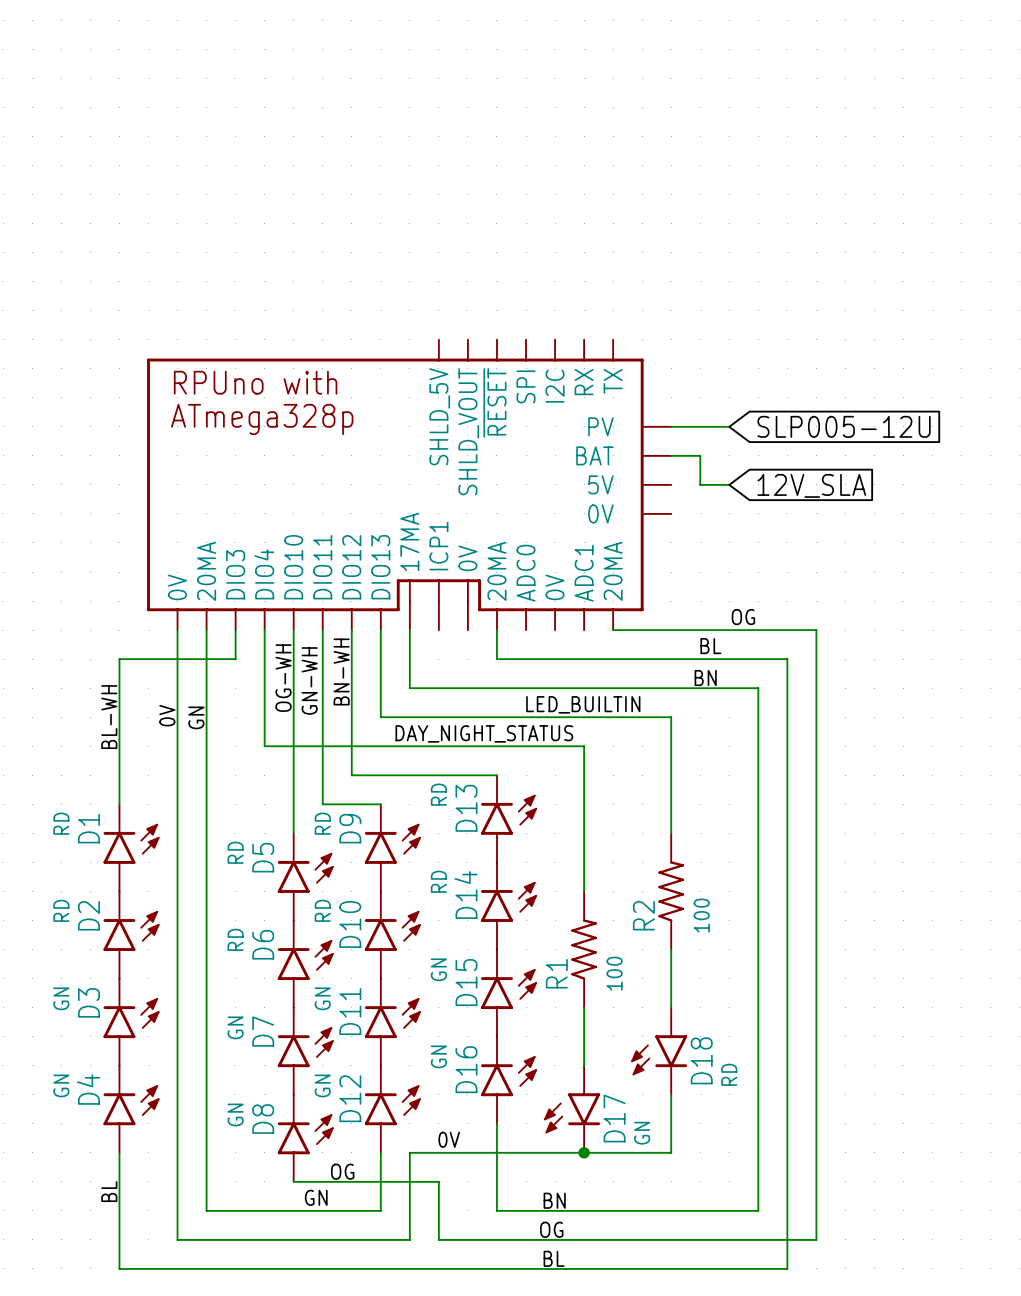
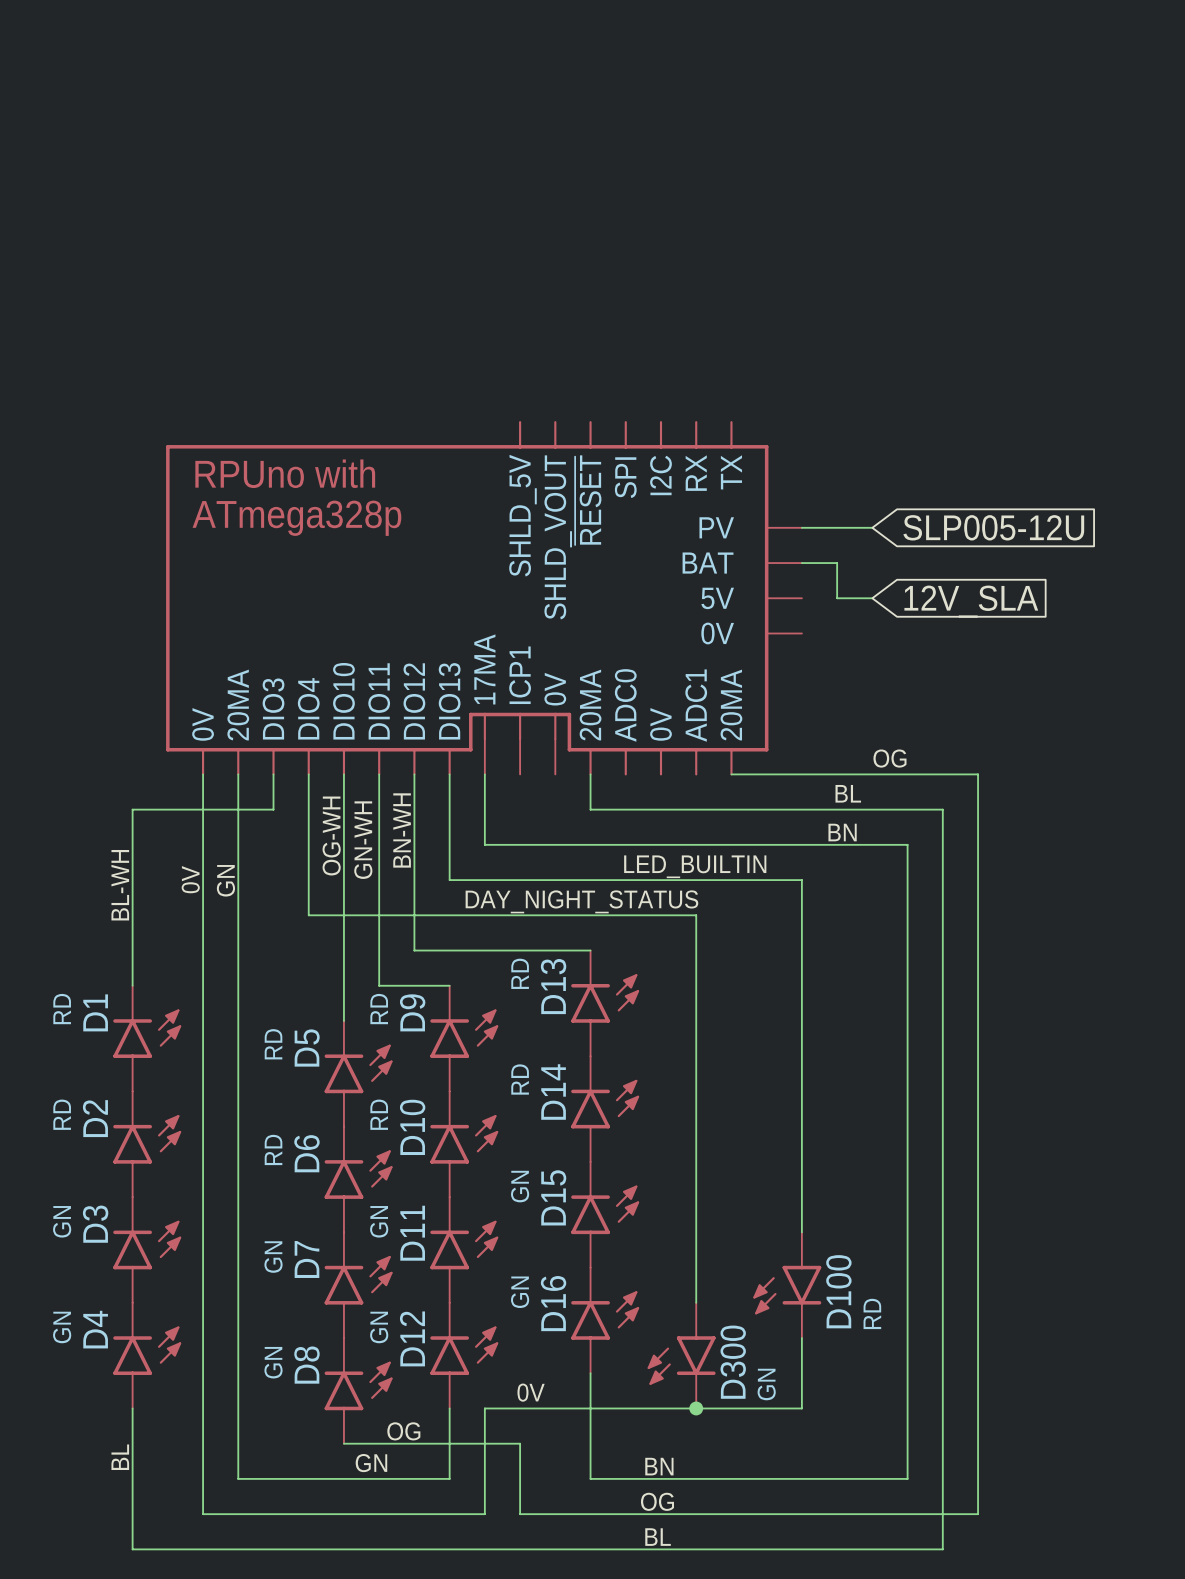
R2: 100 (671, 891) -> none
R1: 100 (584, 949) -> none
D18 name: D18 (701, 1060) -> D100 (838, 1291)
D17 name: D17 (614, 1118) -> D300 (733, 1362)

